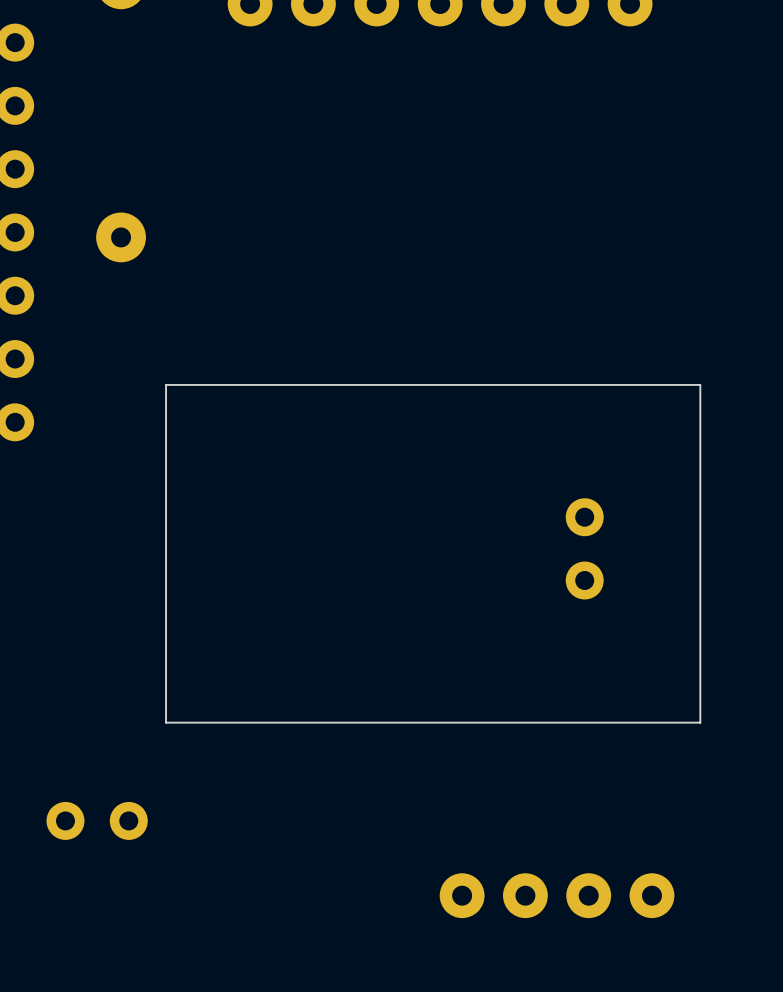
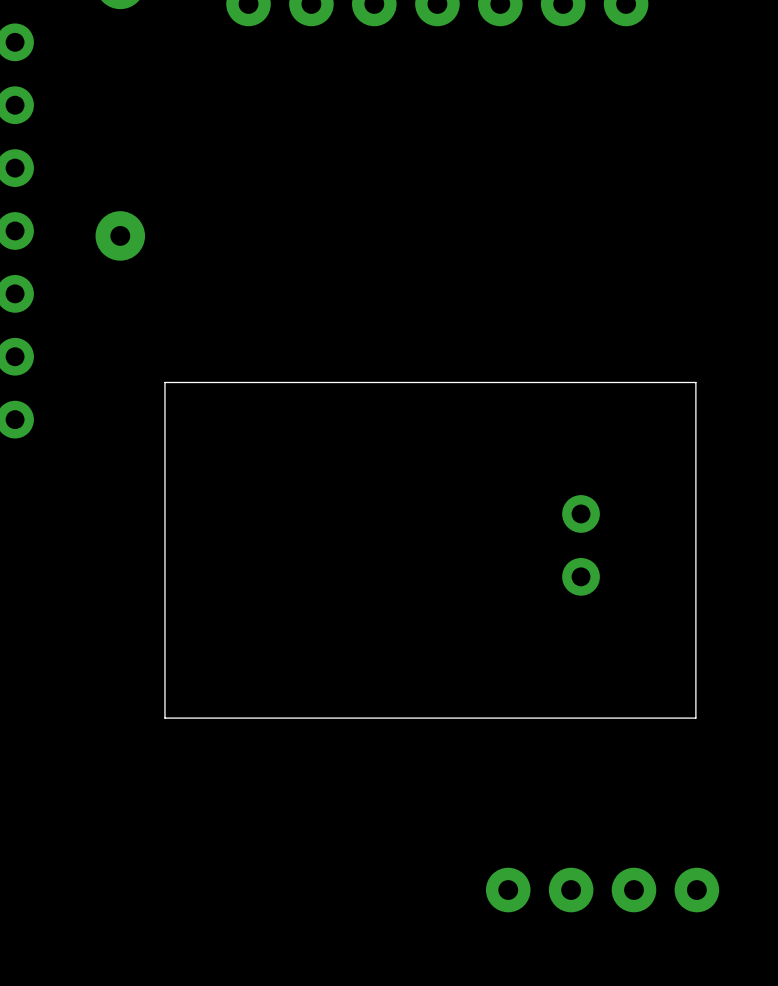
part: (97, 820) -> none
part position: (557, 895) -> (602, 890)

